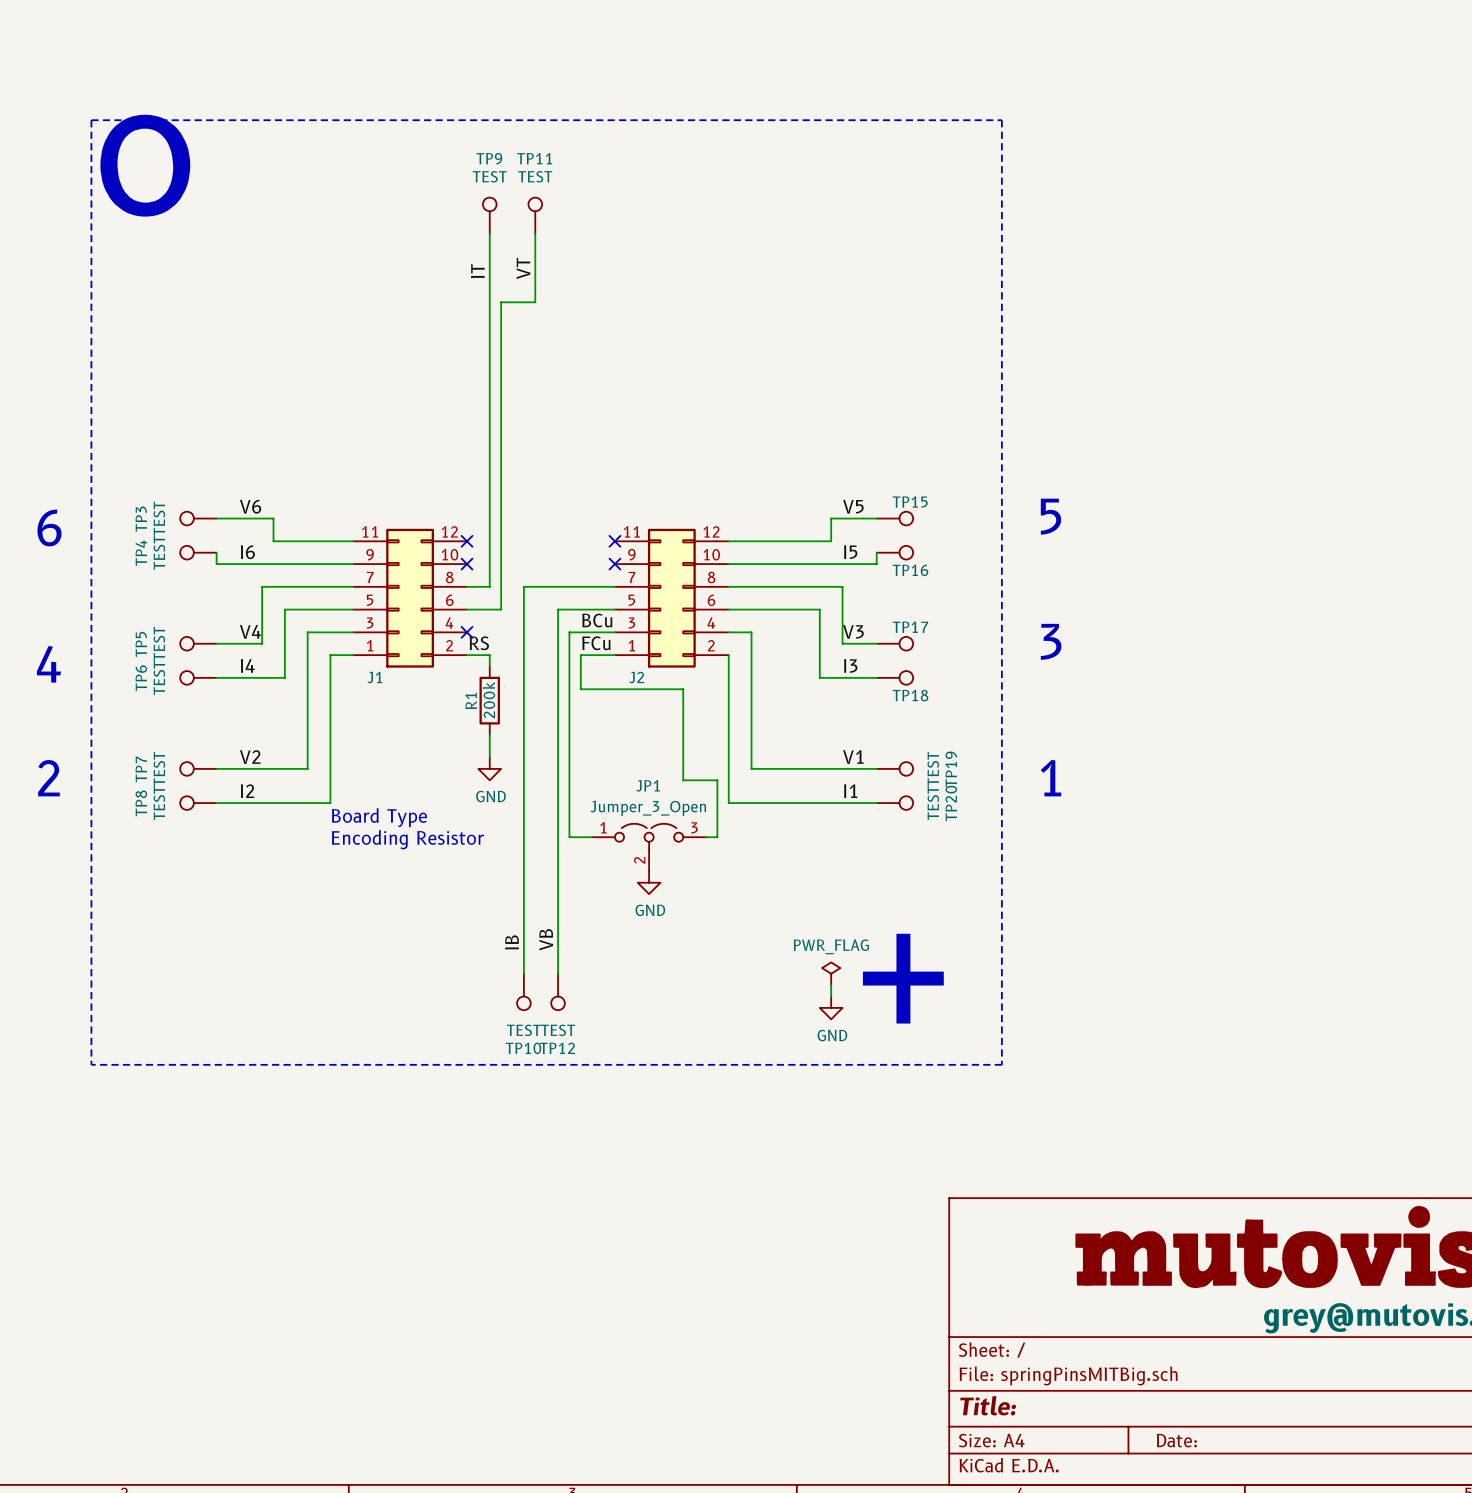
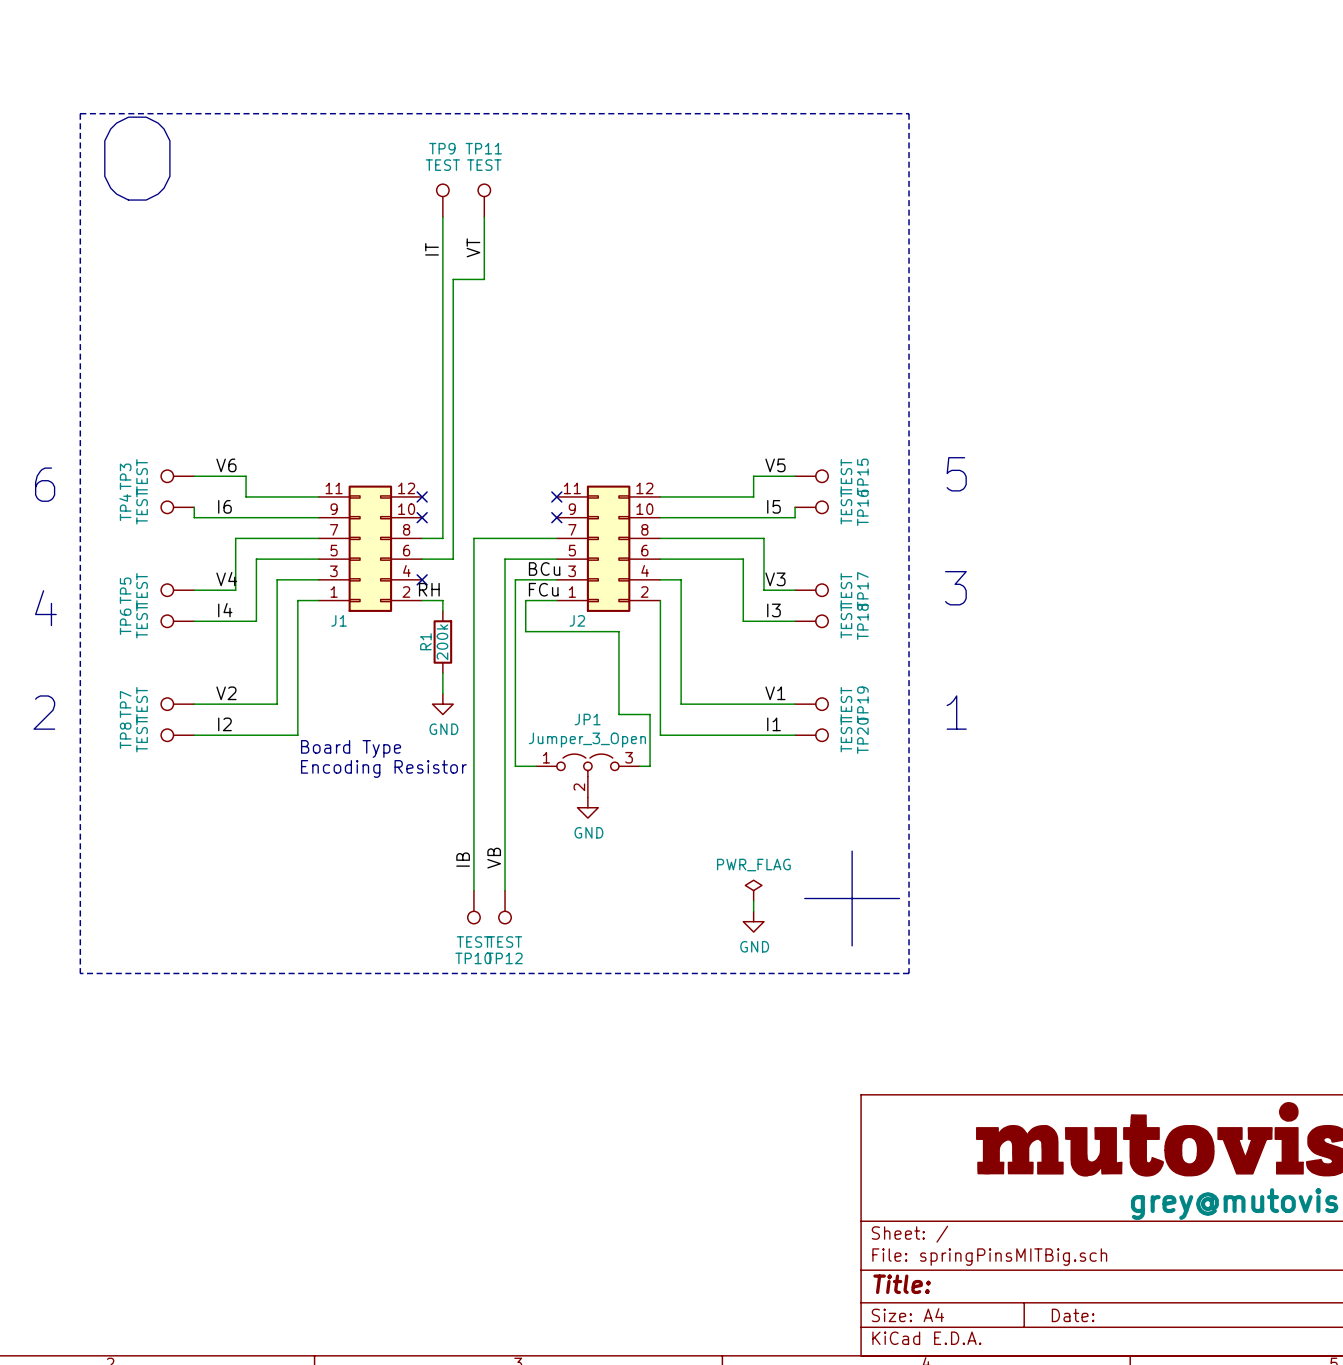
TP15 name rotation: 0° (910, 502) -> 90° counterclockwise (862, 476)
TP15 value: none -> TEST (846, 476)
TP16 value: none -> TEST (846, 507)
TP16 name rotation: 0° (910, 570) -> 90° counterclockwise (862, 507)
TP17 name rotation: 0° (910, 627) -> 90° counterclockwise (862, 590)
label: RS (479, 643) -> RH (429, 589)
TP17 value: none -> TEST (846, 590)
TP18 value: none -> TEST (846, 621)
TP18 name rotation: 0° (910, 695) -> 90° counterclockwise (862, 621)

